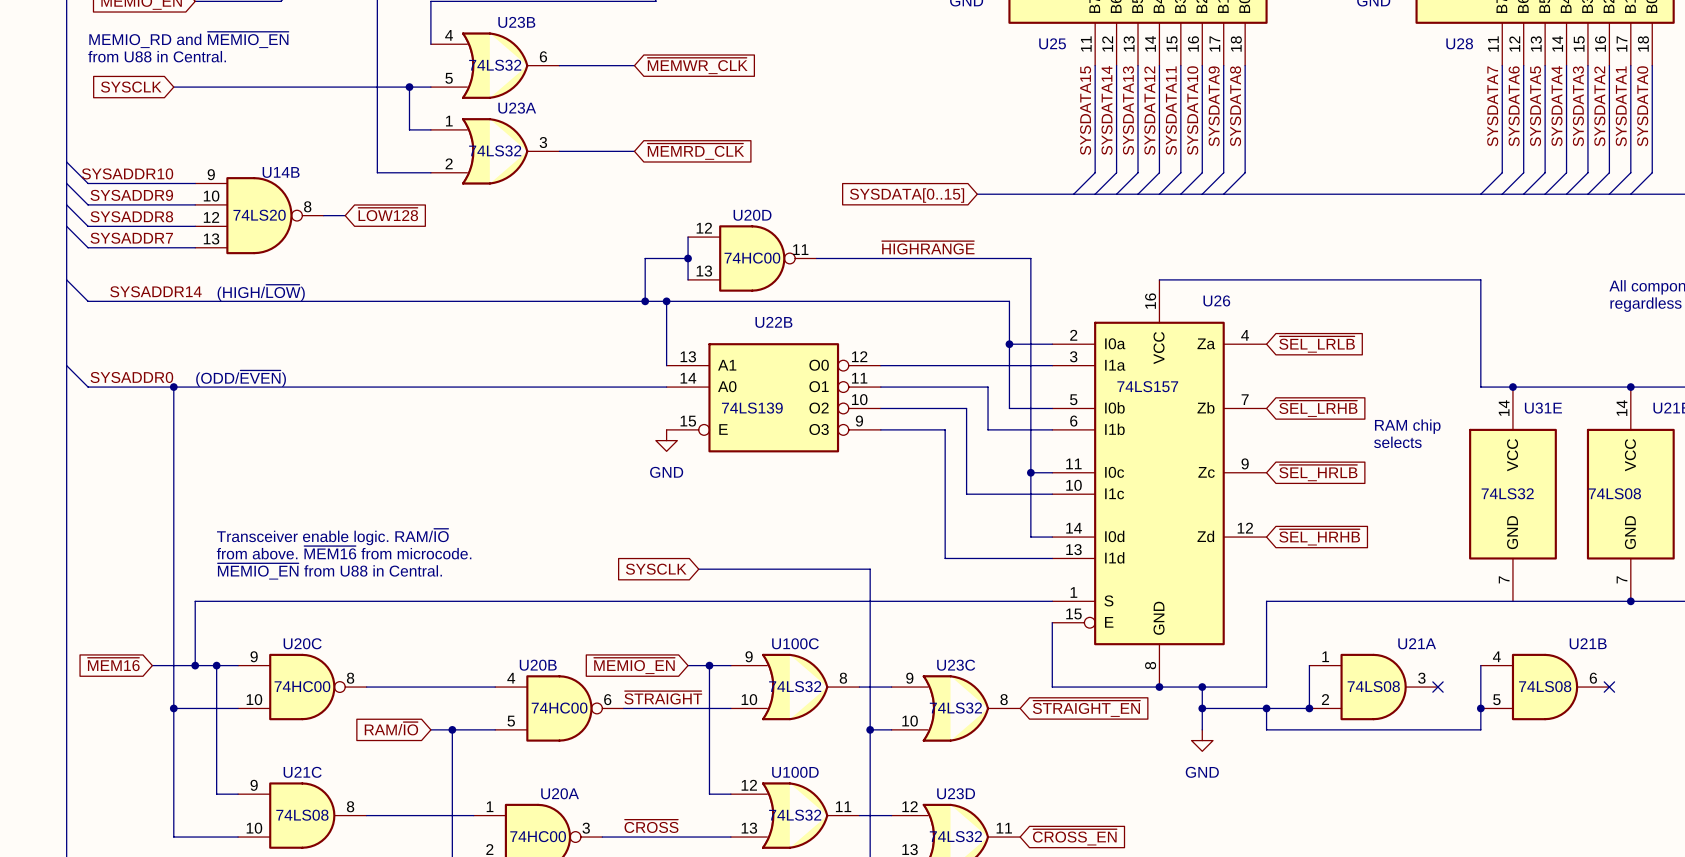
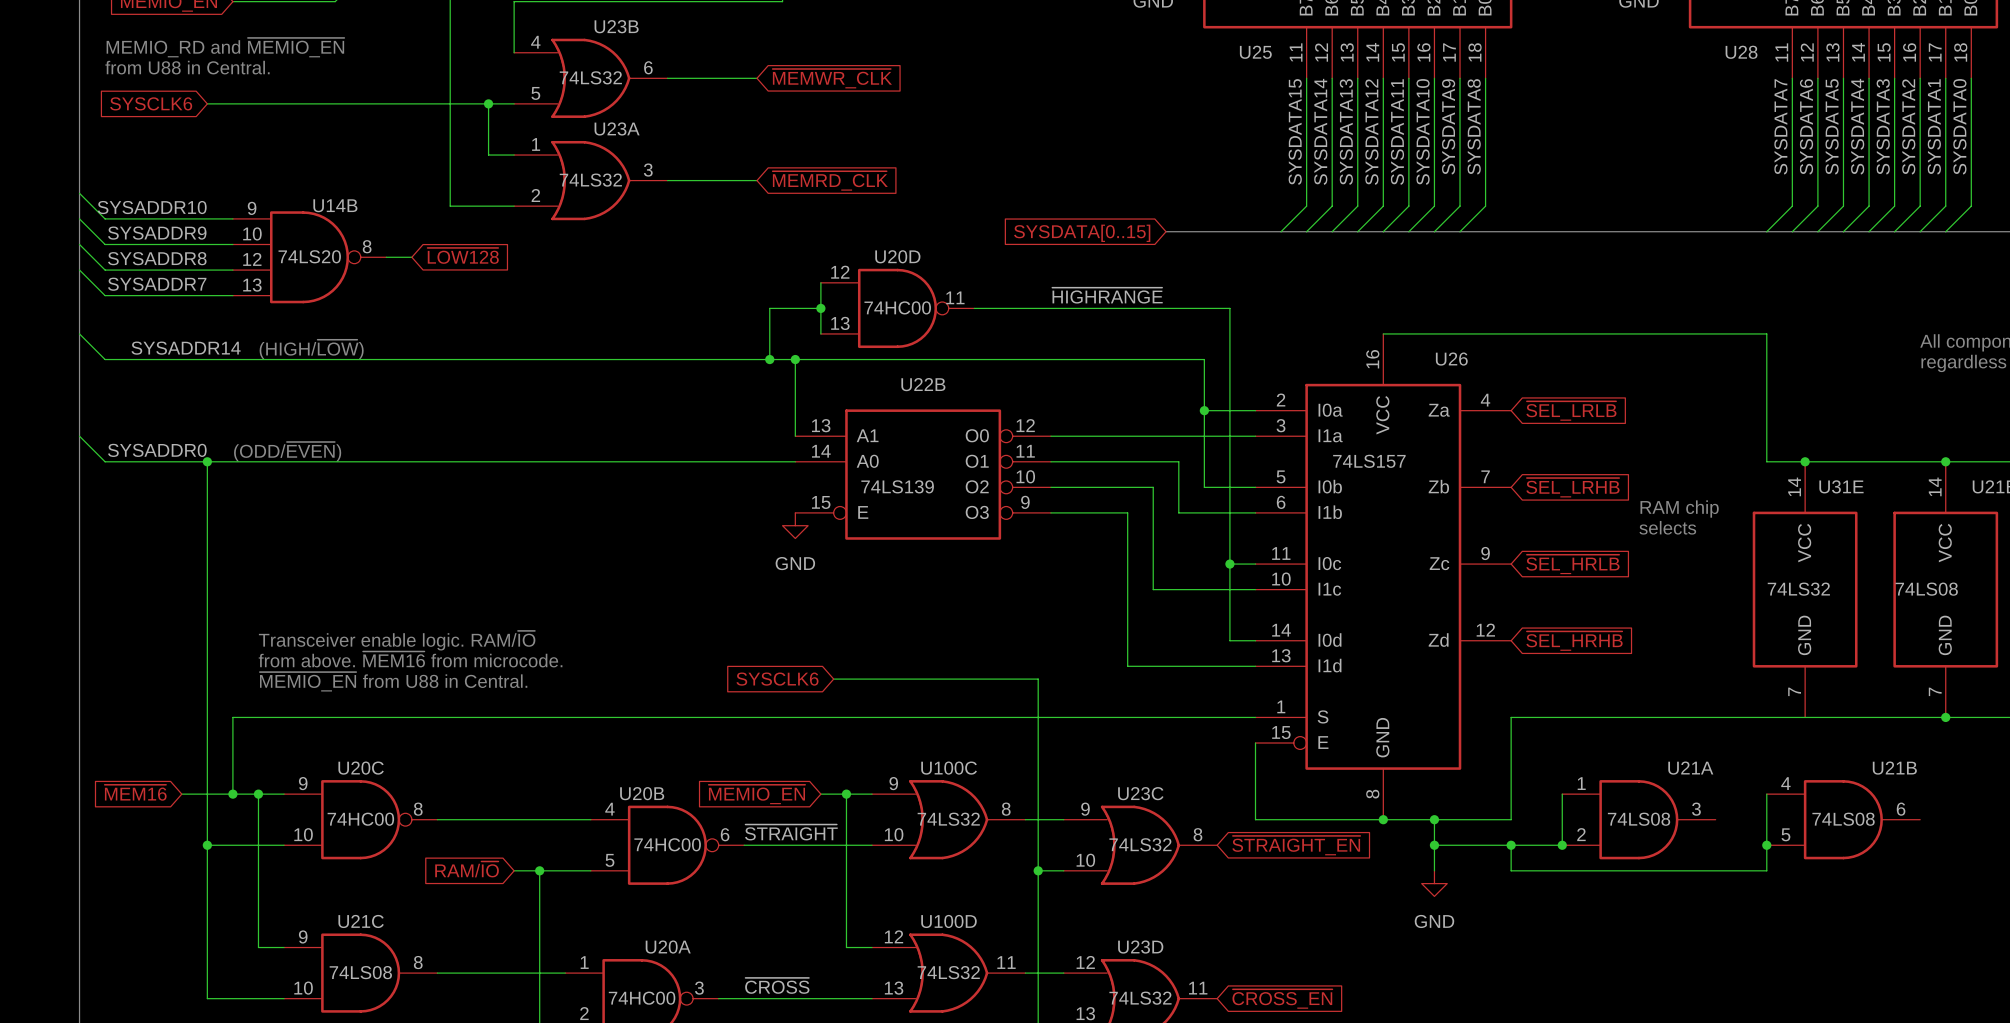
global label: SYSCLK (131, 87) -> SYSCLK6 (151, 103)
global label: SYSCLK (656, 569) -> SYSCLK6 (777, 679)
no-connect mark: (1437, 687) -> none
no-connect mark: (1609, 687) -> none

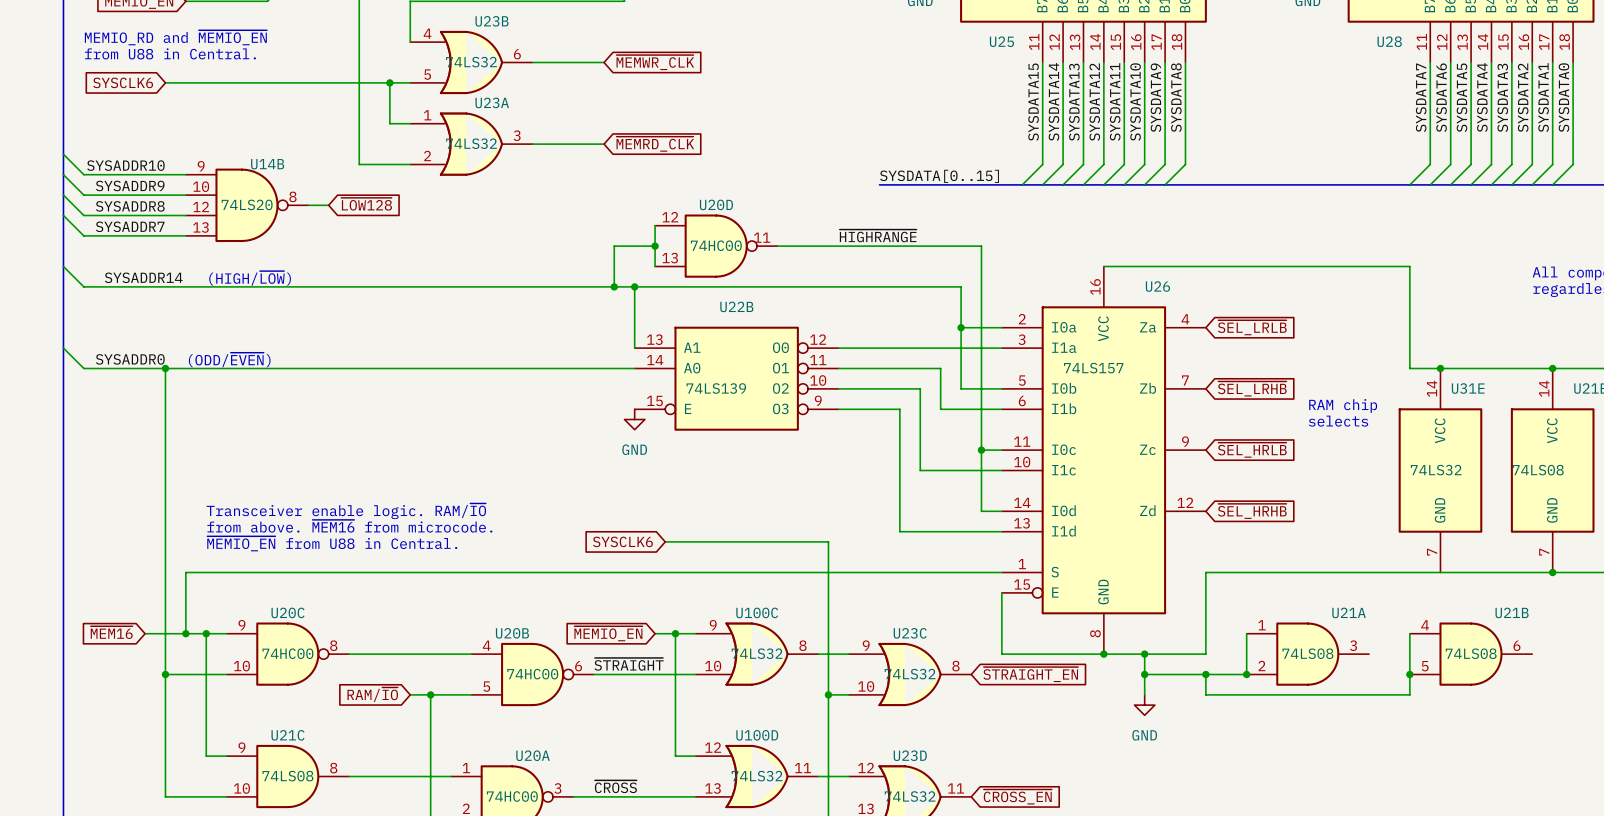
label: none -> SYSDATA[0..15] (939, 176)
bus: none -> (879, 184) (930, 184)
global label: SYSDATA[0..15] (1082, 233) -> none

